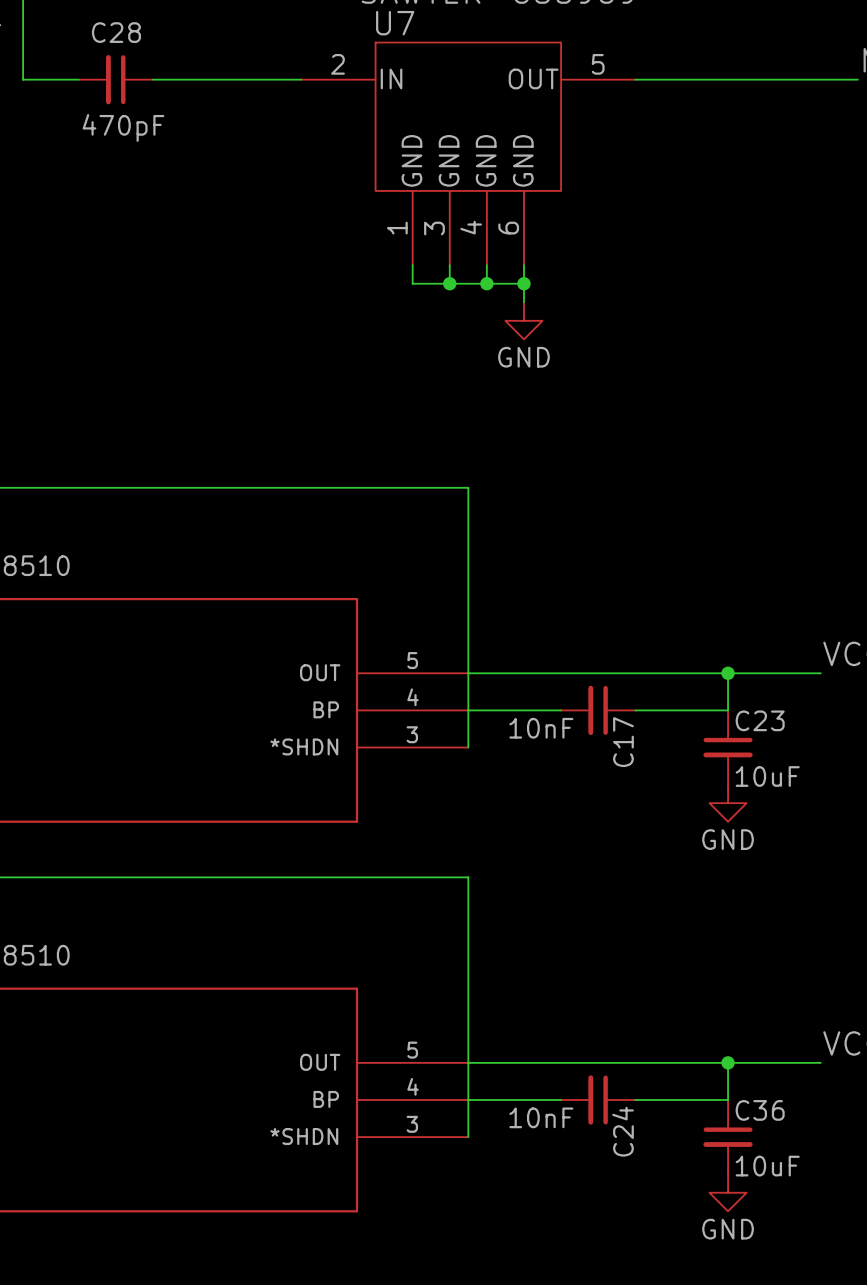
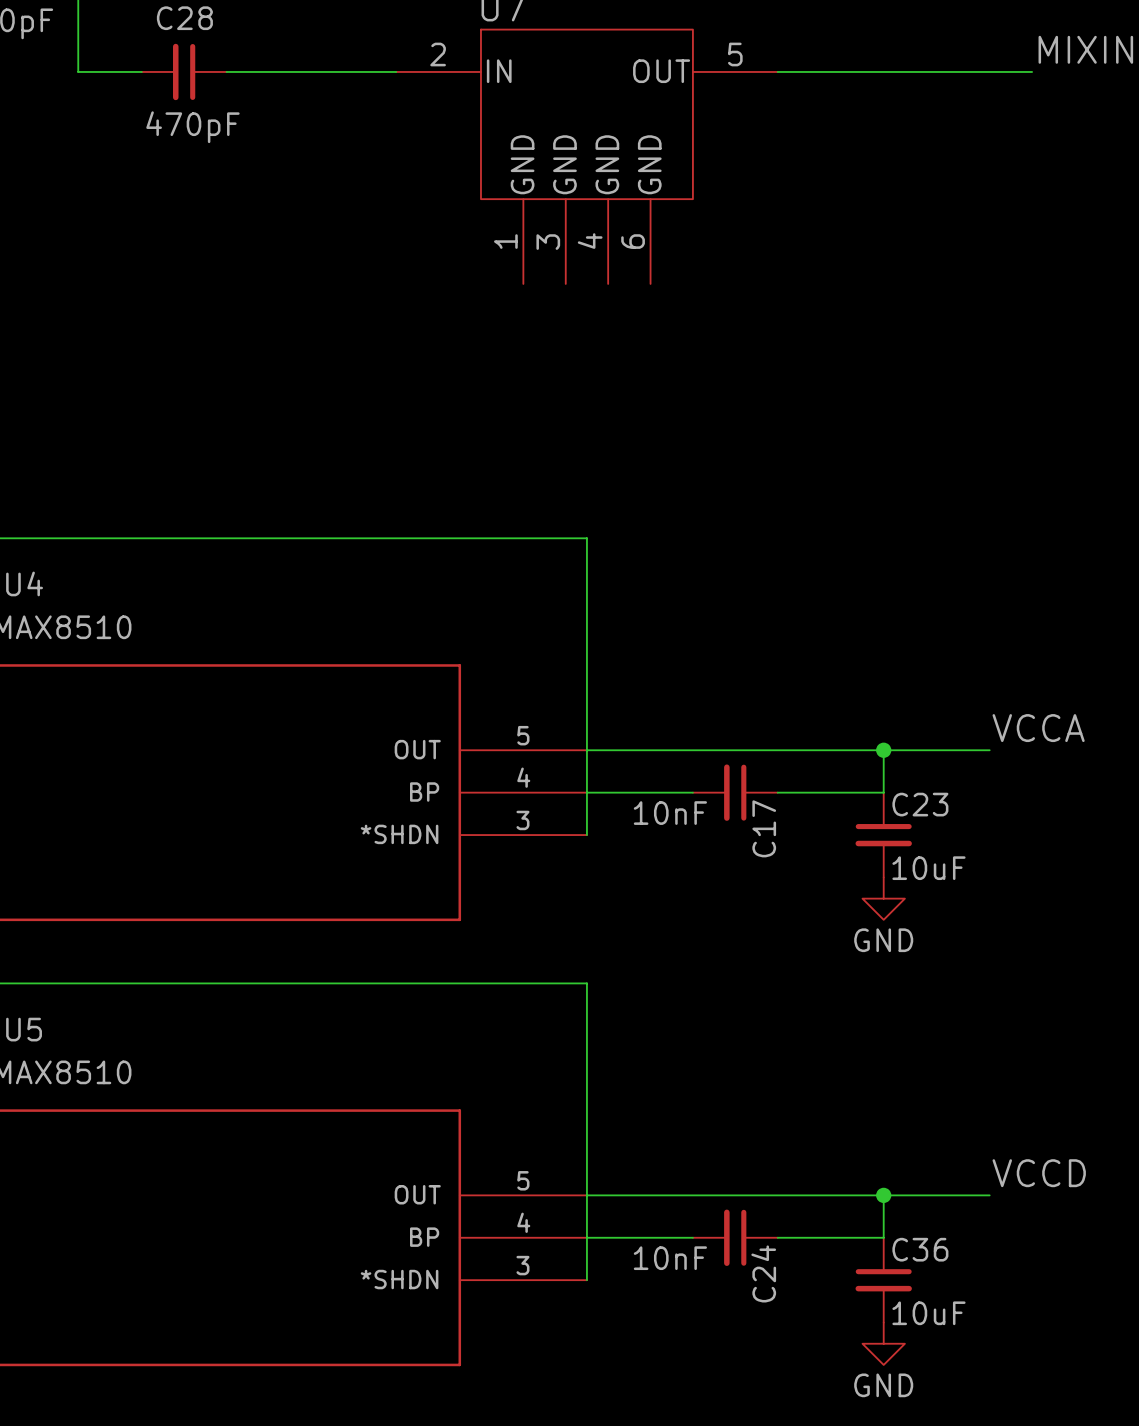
wire: (412, 265) (412, 283) (523, 283) -> none
wire: (449, 265) (449, 283) -> none
wire: (486, 265) (486, 283) -> none
wire: (523, 265) (523, 302) -> none
junction: (449, 283) -> none
junction: (486, 283) -> none
junction: (523, 283) -> none
power symbol: GND (523, 320) -> none

